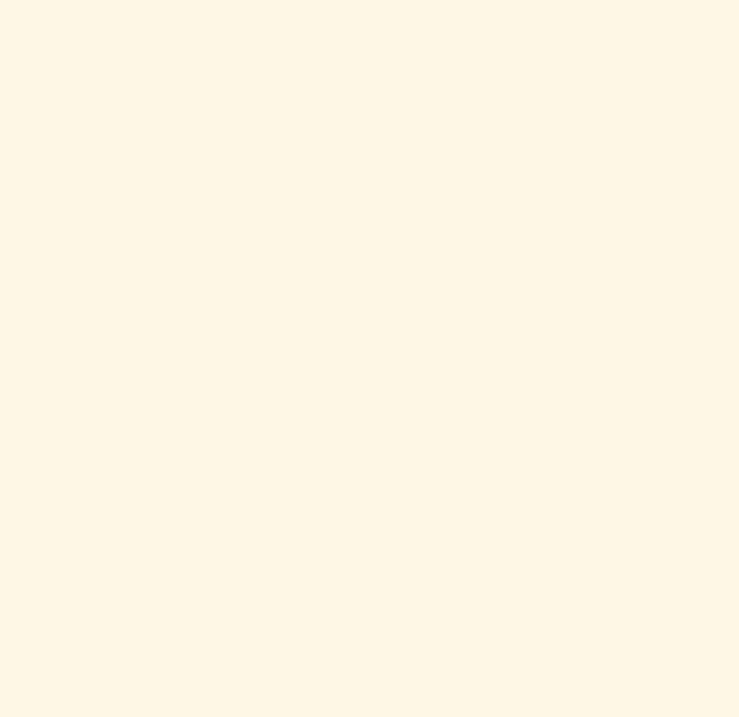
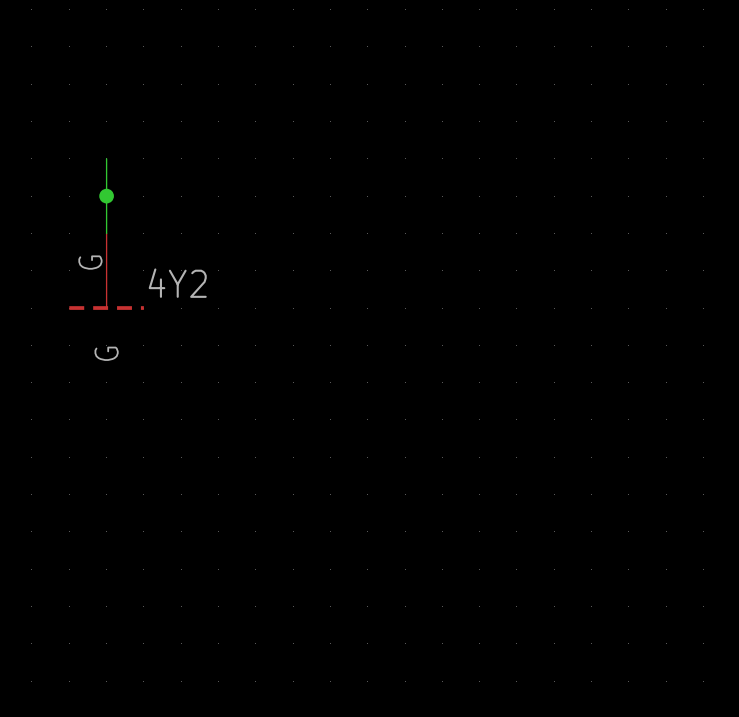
wire: none -> (106, 158) (106, 233)
junction: none -> (106, 196)
4Y2: none -> (106, 271)

